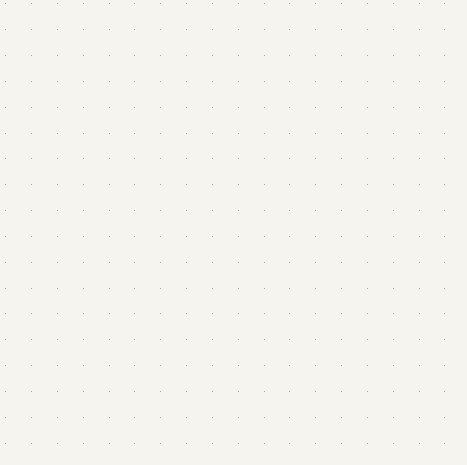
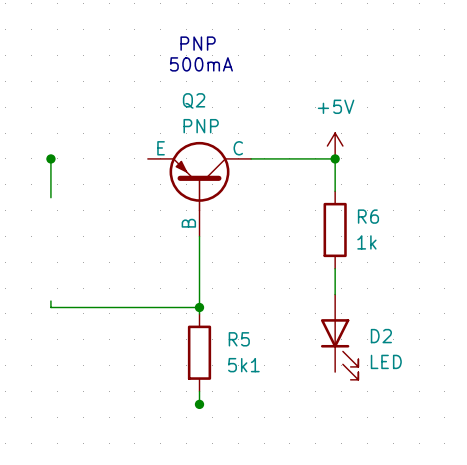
text: none -> PNP (198, 43)
text: none -> 500mA (201, 64)
power symbol: none -> +5V (335, 146)
wire: none -> (50, 158) (50, 197)
junction: none -> (50, 158)
wire: none -> (251, 158) (335, 158) (335, 191)
junction: none -> (335, 158)
Q2: none -> PNP (199, 189)
R6: none -> 1k (335, 229)
wire: none -> (199, 236) (199, 313)
wire: none -> (335, 268) (335, 294)
wire: none -> (50, 301) (50, 307) (199, 307)
junction: none -> (199, 307)
D2: none -> LED (339, 337)
R5: none -> 5k1 (199, 352)
wire: none -> (199, 391) (199, 404)
junction: none -> (199, 404)

